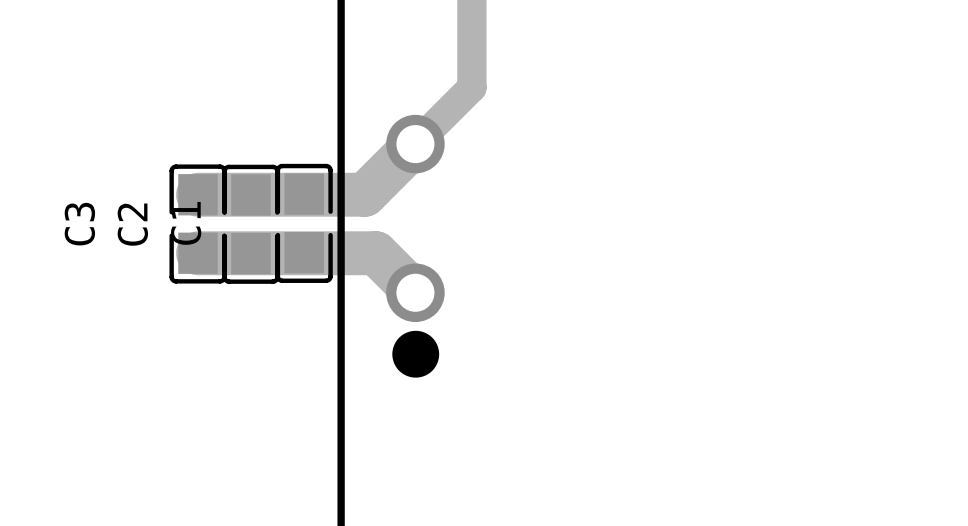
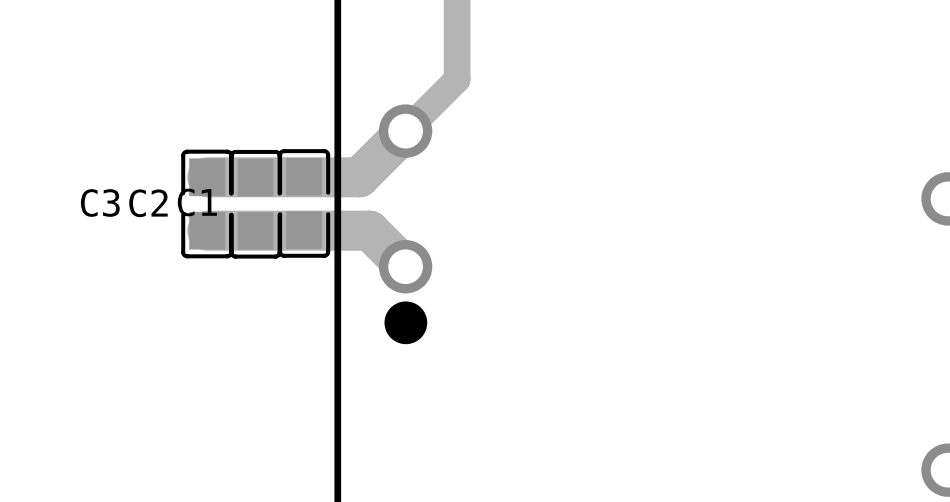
C1 name rotation: 0° (186, 223) -> 90° clockwise (197, 202)
C3 name rotation: 0° (79, 224) -> 90° clockwise (100, 203)
C2 name rotation: 0° (132, 224) -> 90° clockwise (148, 203)

